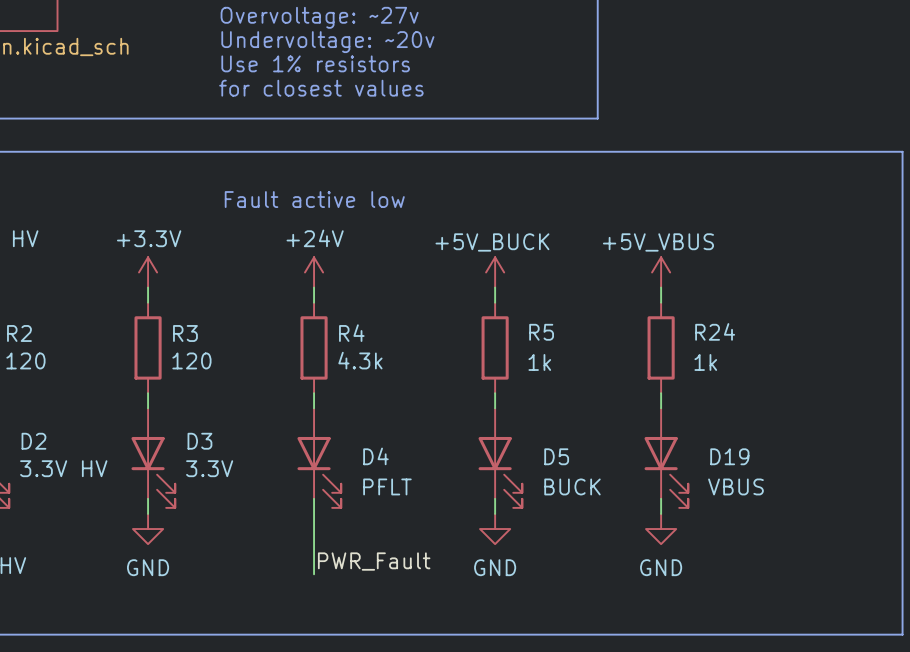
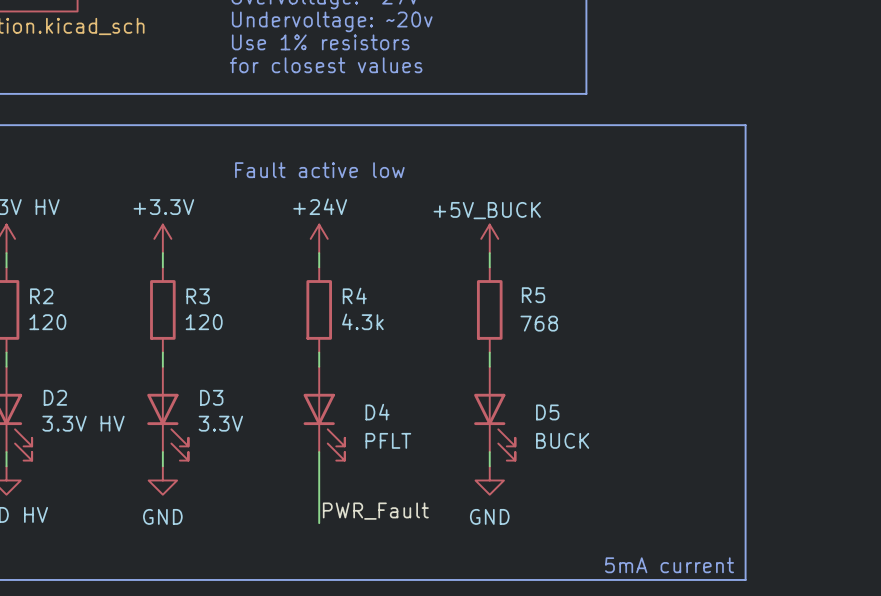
line: (766, 151) (902, 151) (902, 634) (766, 634) -> (745, 125) (745, 579)
power symbol: +5V_VBUS (661, 272) -> none
wire: (661, 287) (661, 302) -> none
R24: 1k (661, 347) -> none
R5 value: 1k (539, 362) -> 768 (539, 323)
wire: (661, 393) (661, 408) -> none
D19: VBUS (666, 458) -> none
wire: (661, 498) (661, 513) -> none
power symbol: GND (661, 529) -> none
text: none -> 5mA current (669, 565)

